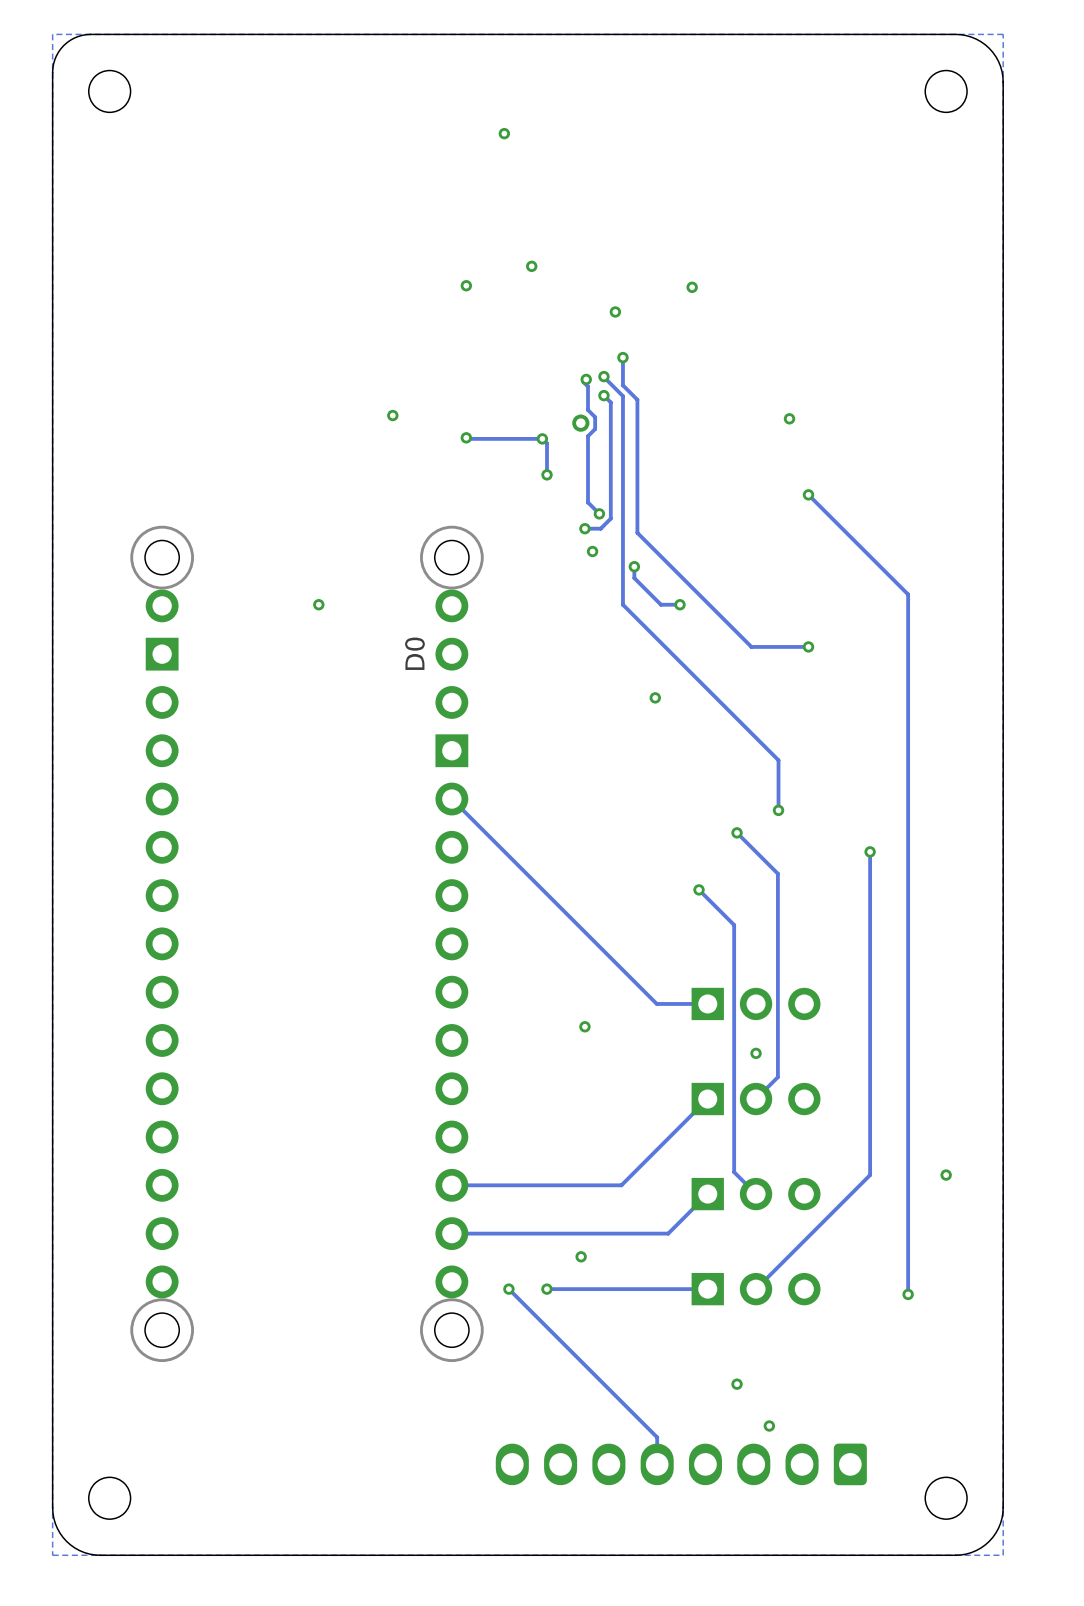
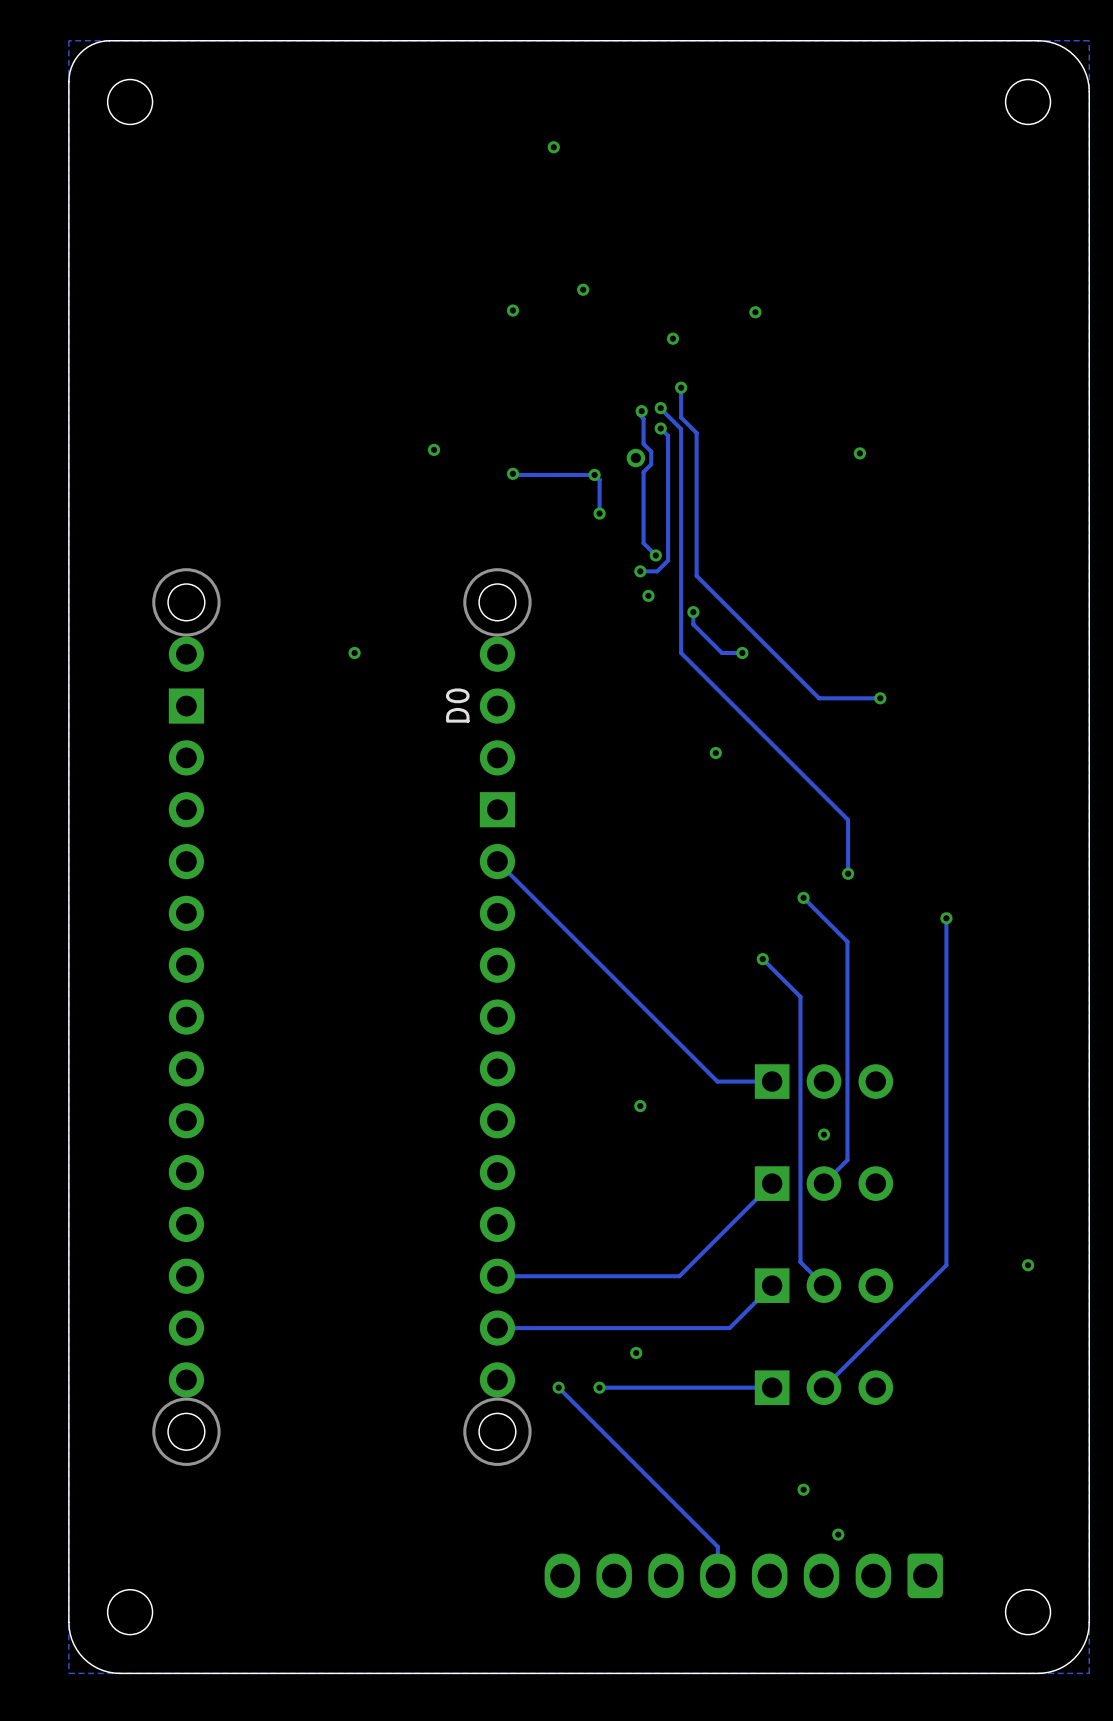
track: (808, 494) (908, 594) (908, 1294) -> none
via: (808, 494) -> none
via: (908, 1294) -> none

